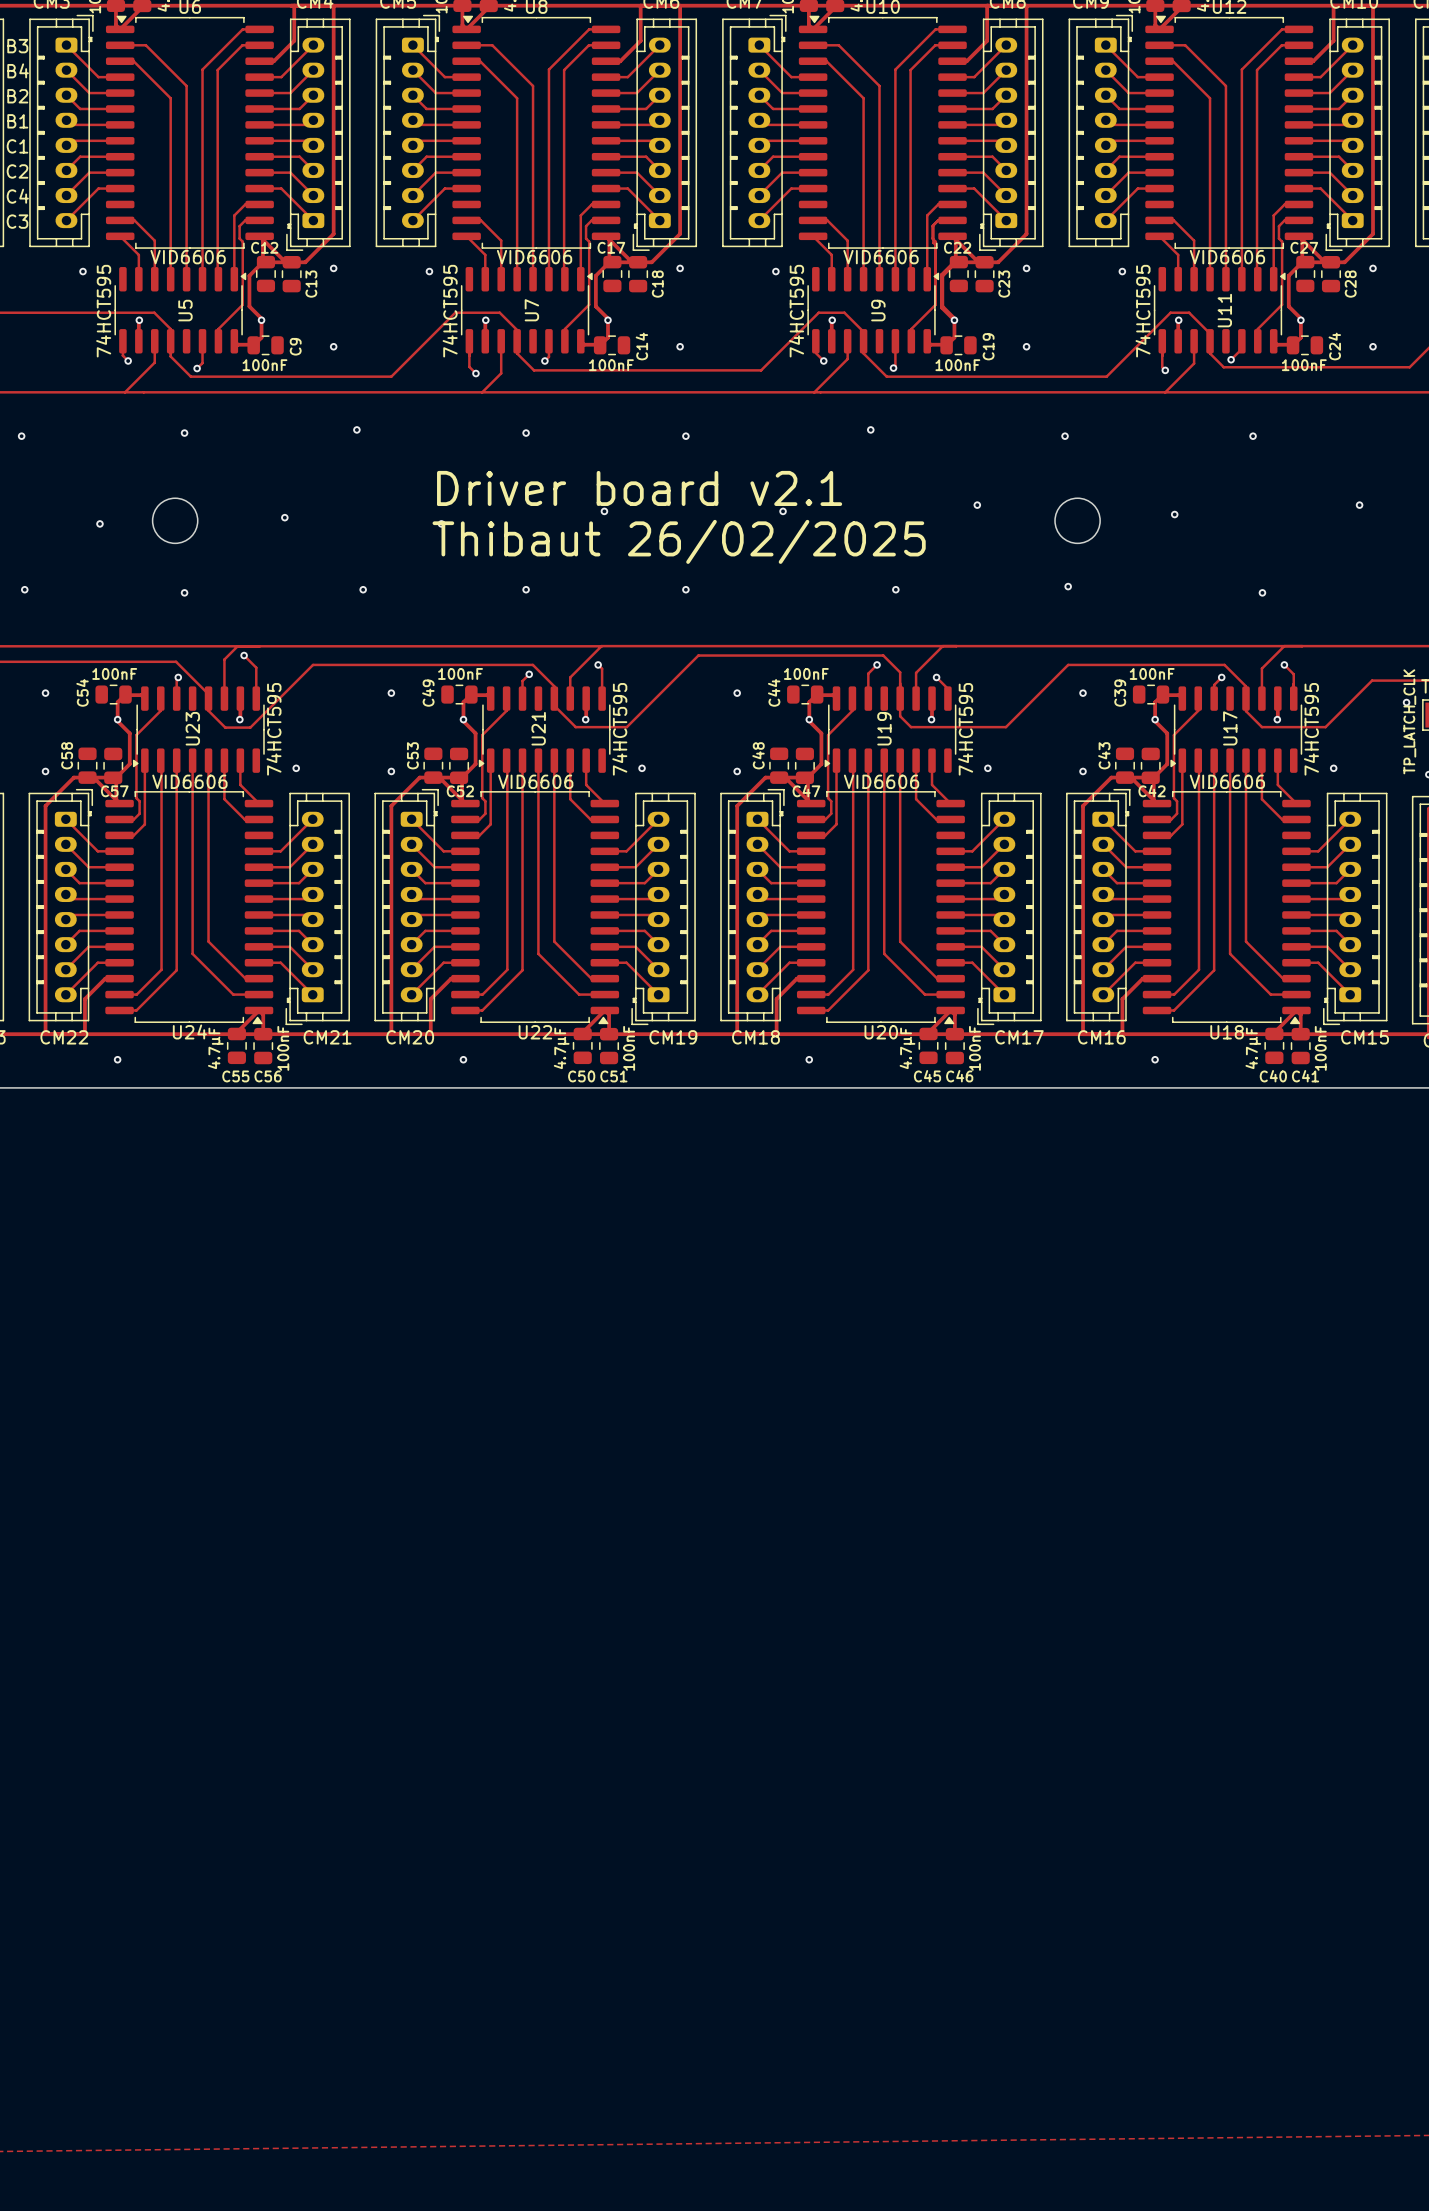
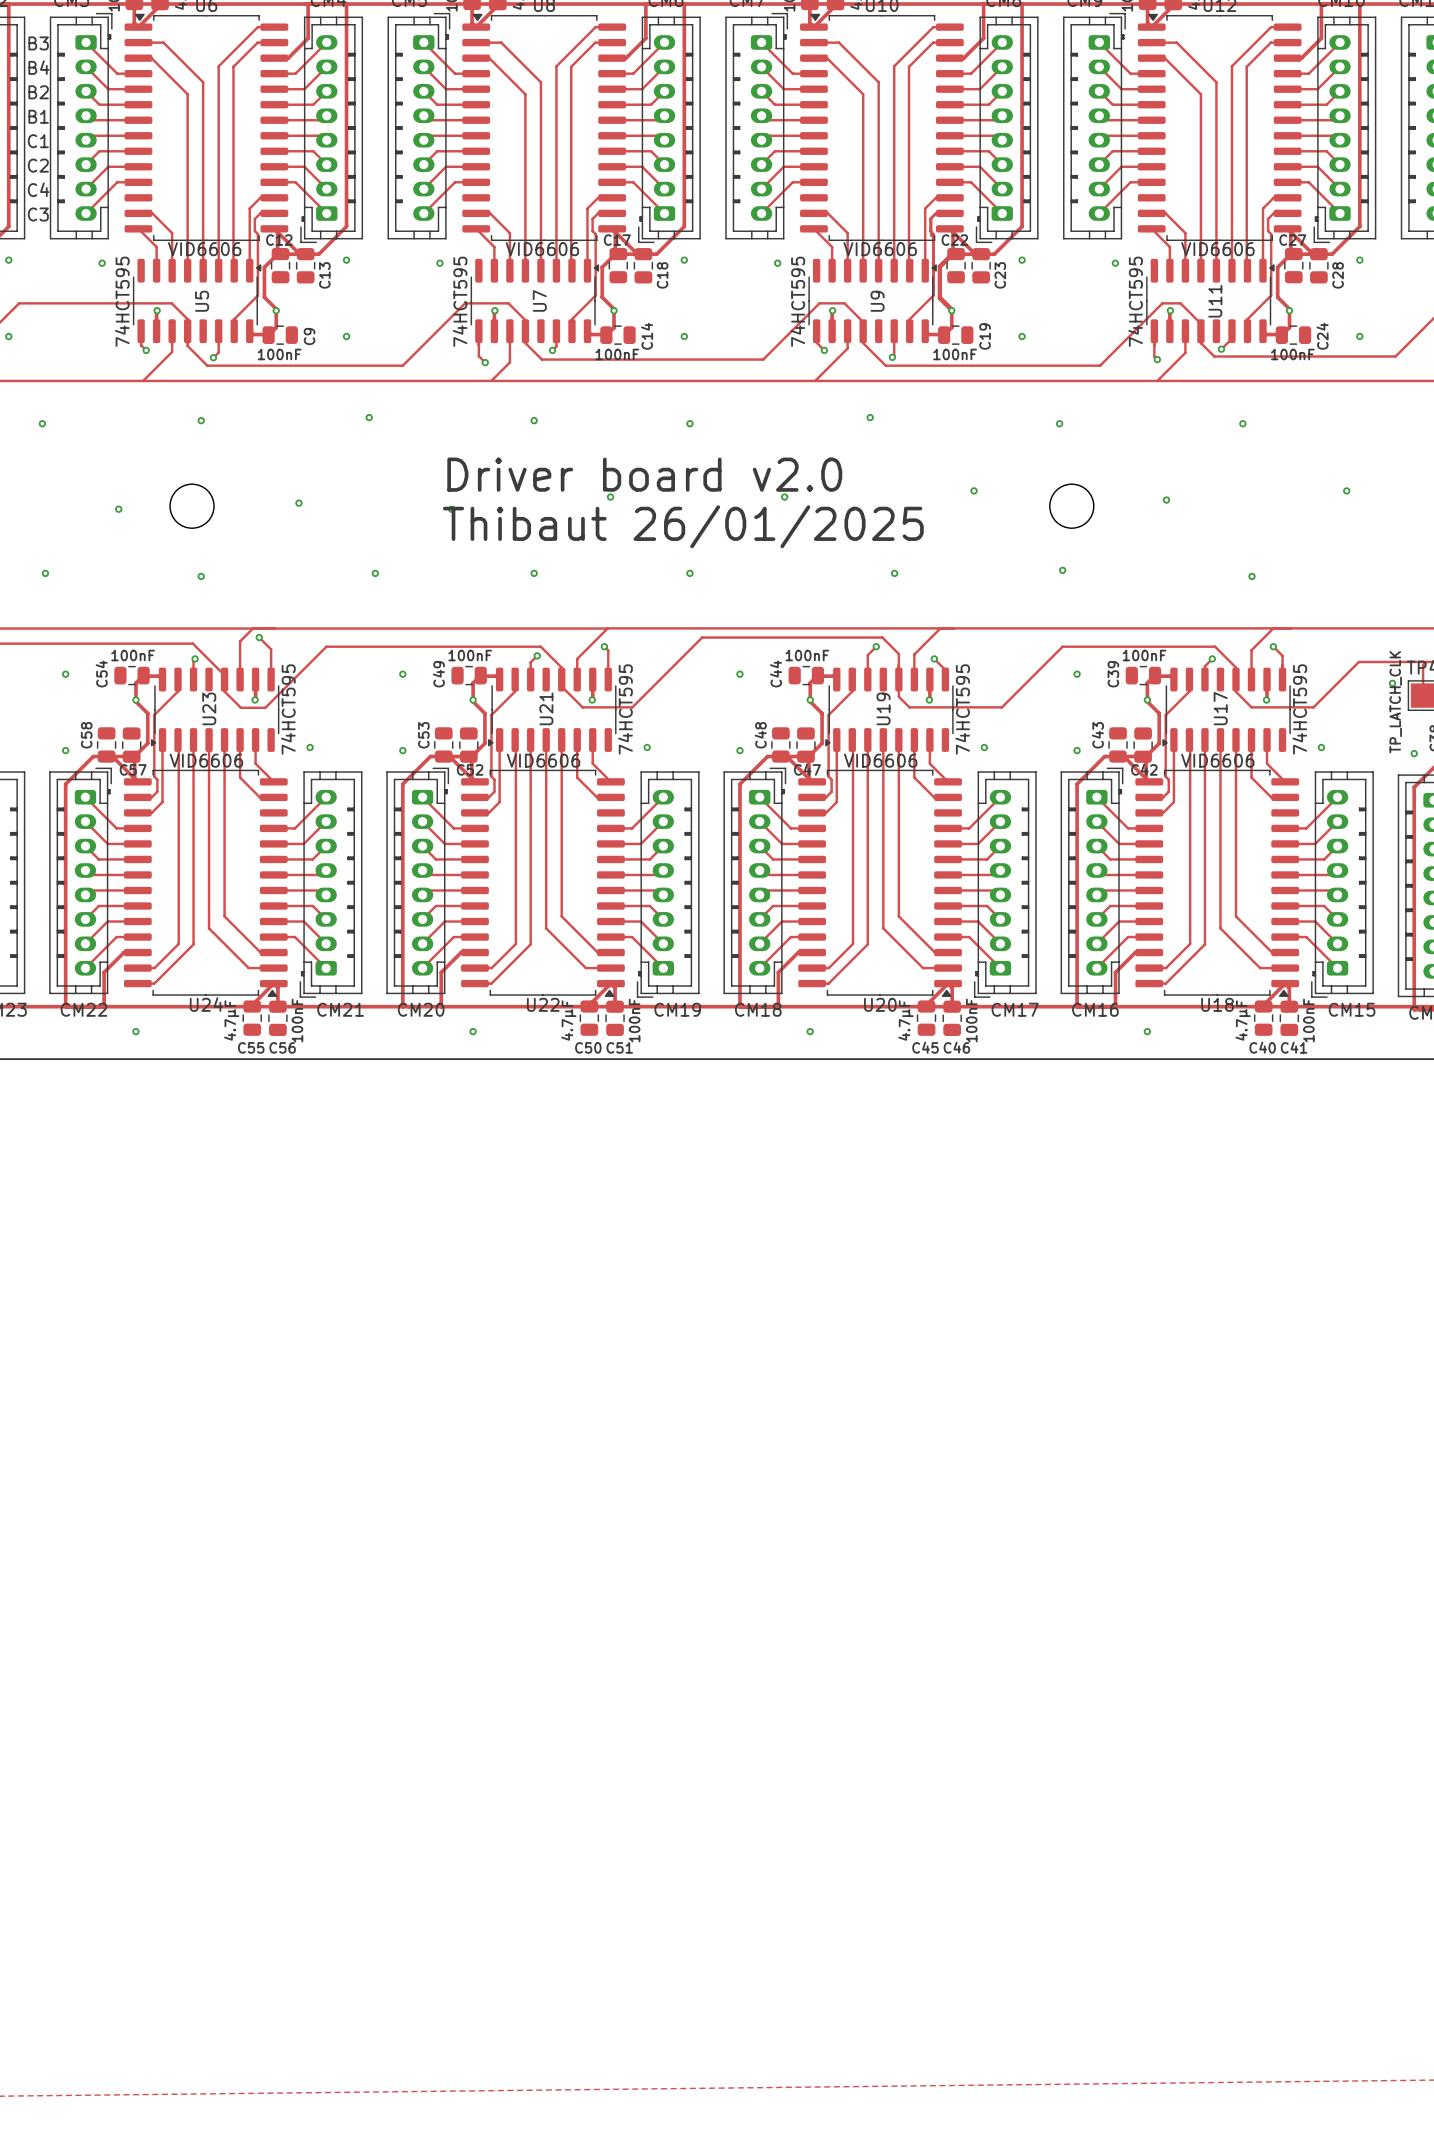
text: Driver board v2.1 (639, 488) -> Driver board v2.0 (644, 474)
text: Thibaut 26/02/2025 (679, 541) -> Thibaut 26/01/2025 (683, 526)

